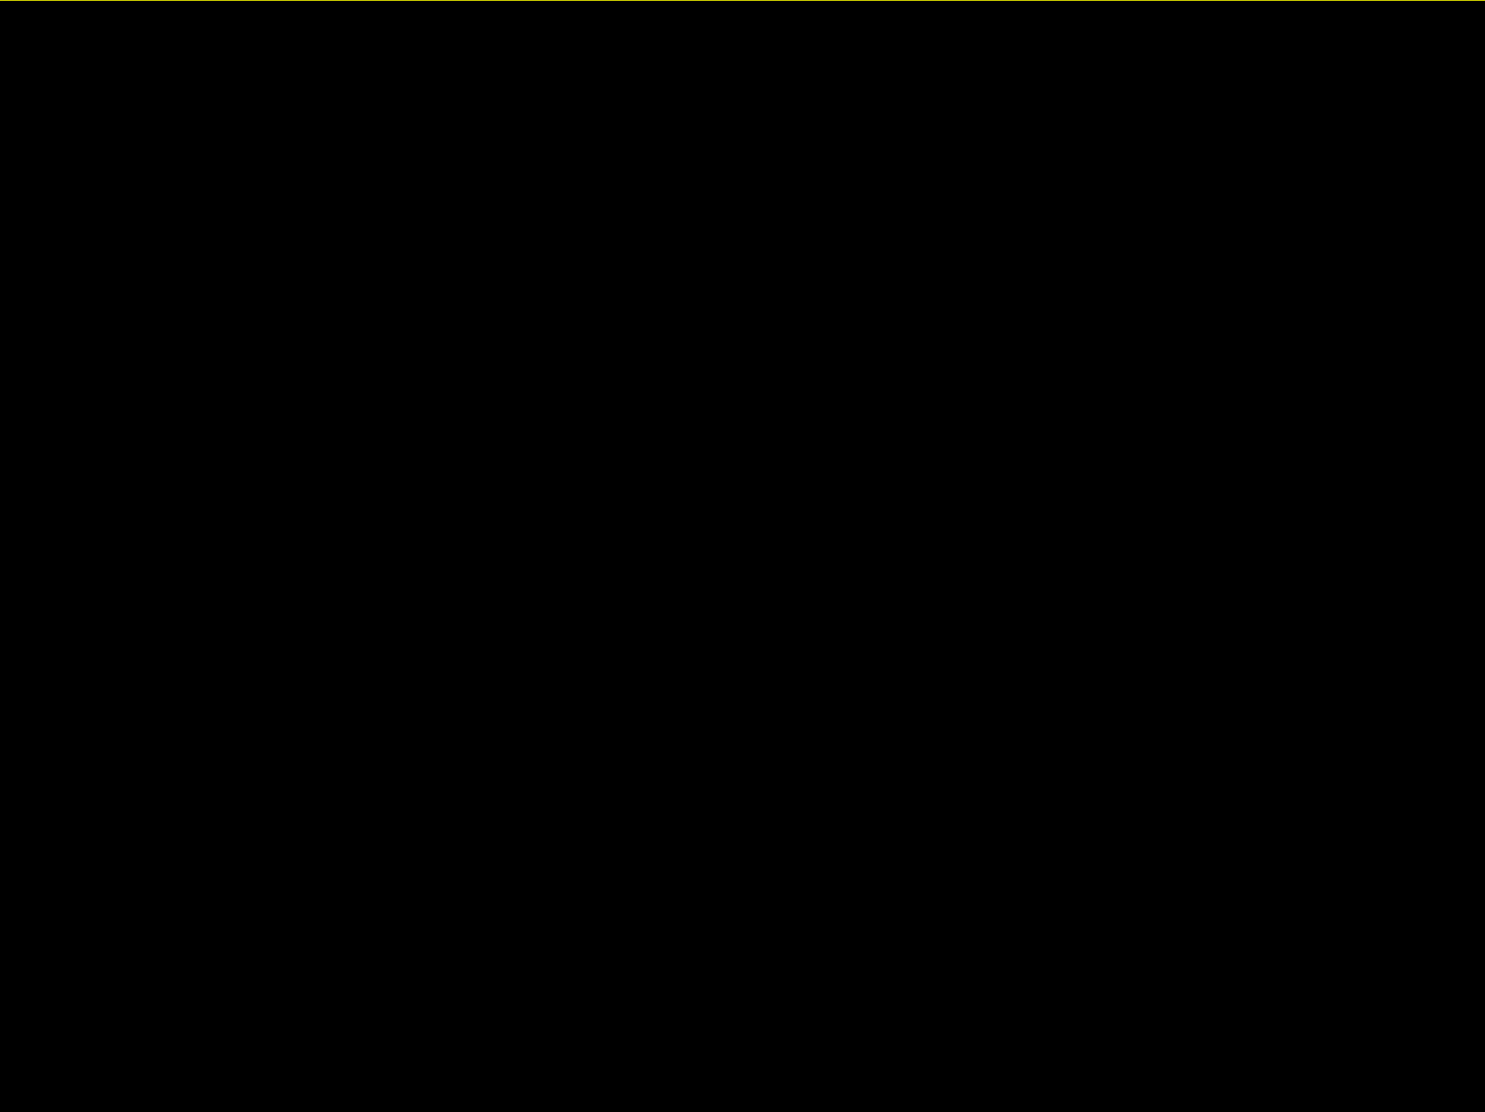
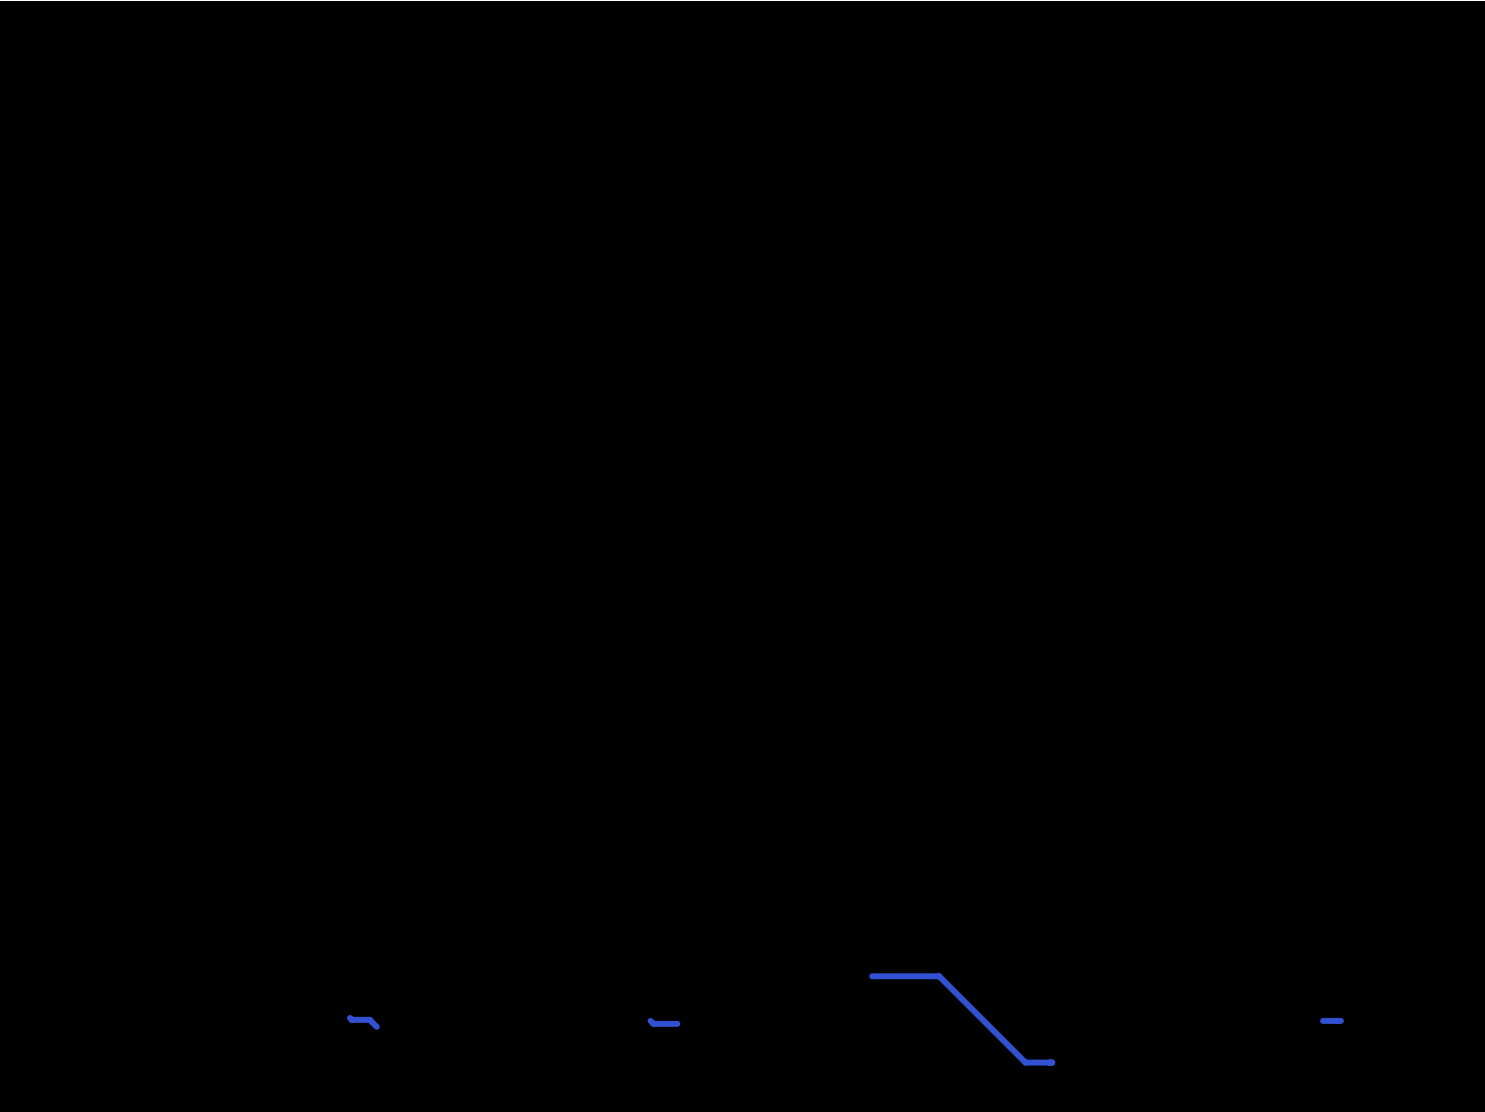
bottom track: none -> (872, 976) (939, 976) (1025, 1062) (1052, 1062)
bottom track: none -> (349, 1017) (351, 1019) (369, 1019) (376, 1026)
bottom track: none -> (650, 1020) (653, 1023) (677, 1023)
bottom track: none -> (1323, 1020) (1340, 1020)

